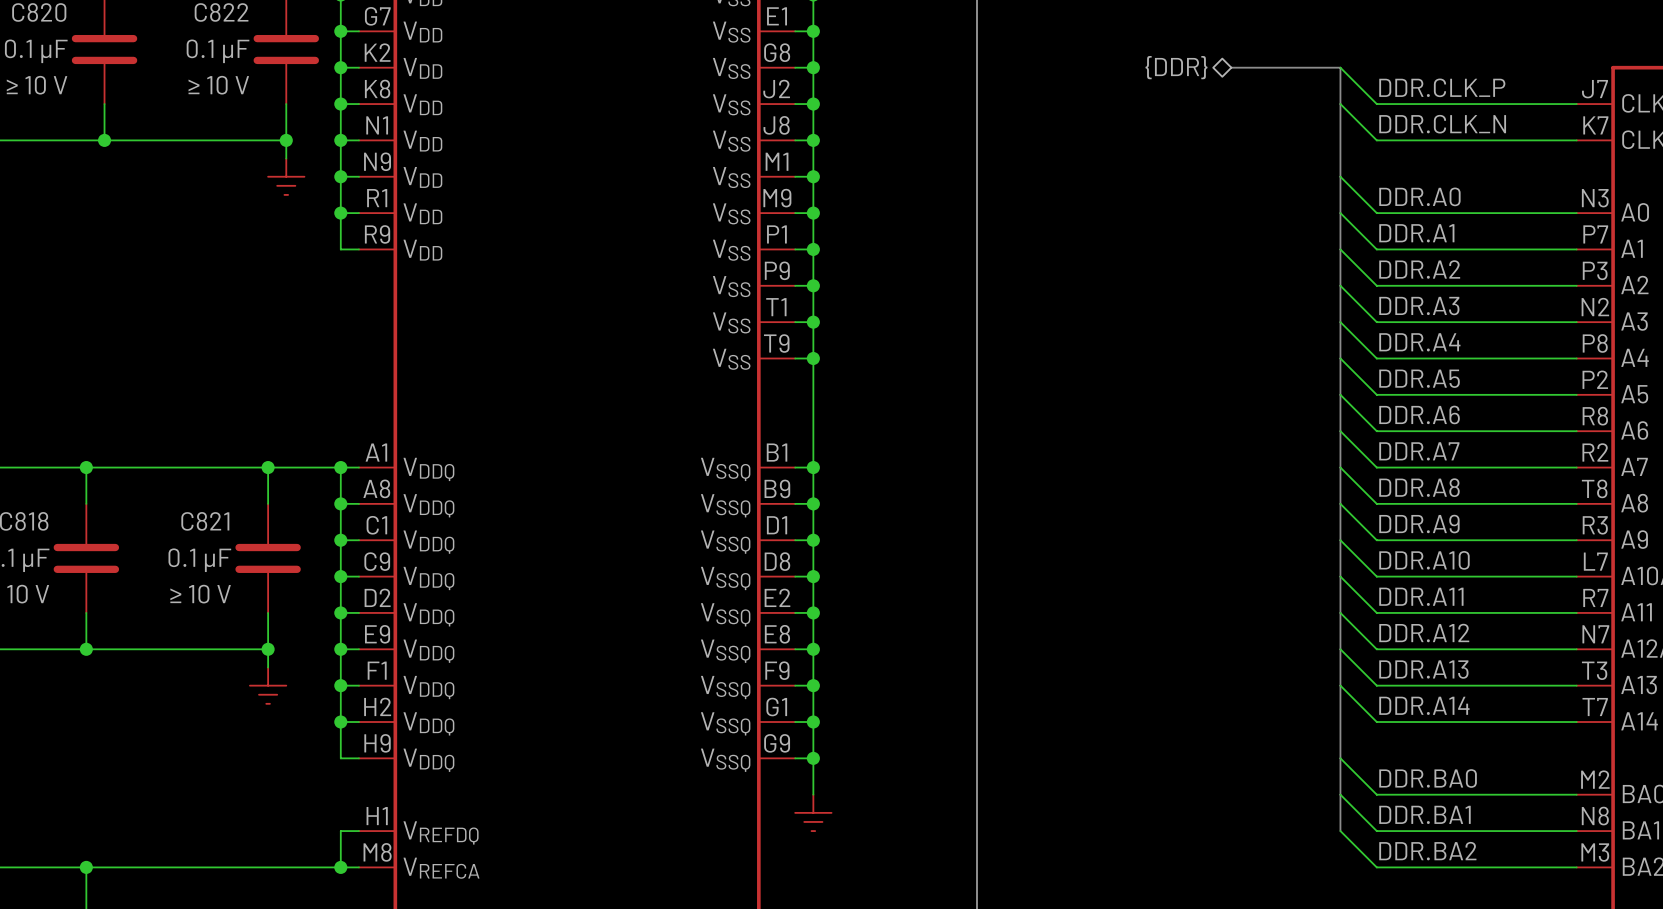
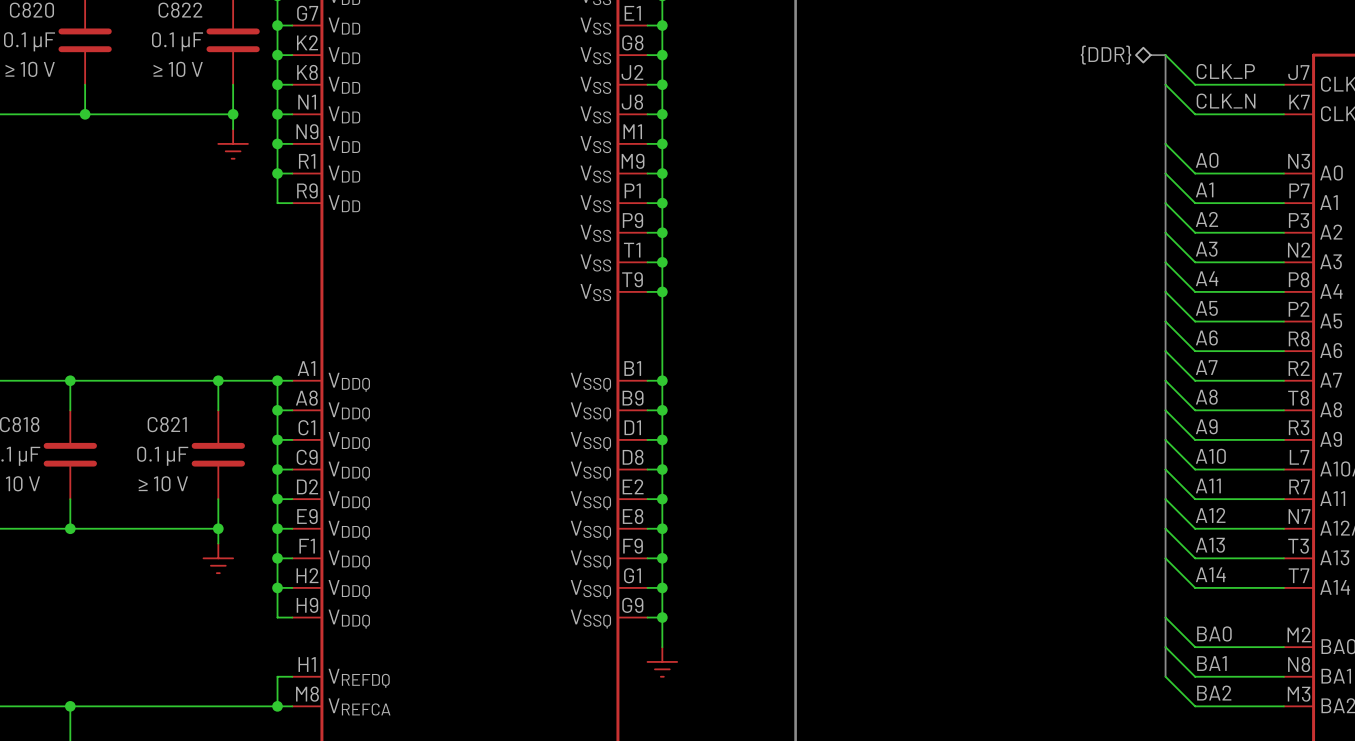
hierarchical label position: {DDR} (1176, 67) -> {DDR} (1106, 55)
bus: (1231, 67) (1340, 67) (1340, 831) -> none
wire: (1340, 67) (1376, 104) (1467, 104) -> (1165, 55) (1195, 84)
bus: none -> (1150, 55) (1165, 55) (1165, 676)
label: DDR.CLK_P (1442, 87) -> CLK_P (1225, 71)
wire: (1340, 104) (1376, 140) (1467, 140) -> (1165, 84) (1195, 114)
label: DDR.CLK_N (1442, 124) -> CLK_N (1226, 101)
wire: (1340, 176) (1376, 213) (1467, 213) -> (1165, 143) (1195, 173)
label: DDR.A0 (1419, 196) -> none
label: none -> A0 (1207, 160)
wire: (1340, 213) (1376, 249) (1467, 249) -> (1165, 173) (1195, 203)
label: DDR.A1 (1416, 233) -> none
label: none -> A1 (1204, 189)
wire: (1340, 249) (1376, 285) (1467, 285) -> (1165, 203) (1195, 232)
label: DDR.A2 (1419, 269) -> none
label: none -> A2 (1206, 219)
wire: (1340, 285) (1376, 322) (1467, 322) -> (1165, 232) (1195, 262)
label: DDR.A3 (1419, 306) -> none
label: none -> A3 (1206, 249)
wire: (1340, 322) (1376, 358) (1467, 358) -> (1165, 262) (1195, 291)
label: DDR.A4 (1419, 342) -> none
label: none -> A4 (1207, 278)
wire: (1340, 358) (1376, 394) (1467, 394) -> (1165, 291) (1195, 321)
label: DDR.A5 (1419, 378) -> none
label: none -> A5 (1206, 308)
wire: (1340, 394) (1376, 431) (1467, 431) -> (1165, 321) (1195, 351)
label: DDR.A6 (1419, 414) -> none
label: none -> A6 (1206, 337)
wire: (1340, 431) (1376, 467) (1467, 467) -> (1165, 351) (1195, 380)
label: DDR.A7 (1419, 451) -> none
label: none -> A7 (1206, 367)
wire: (1340, 467) (1376, 503) (1467, 503) -> (1165, 380) (1195, 410)
label: DDR.A8 (1419, 487) -> none
label: none -> A8 (1206, 397)
wire: (1340, 503) (1376, 540) (1467, 540) -> (1165, 410) (1195, 439)
label: DDR.A9 (1419, 524) -> none
label: none -> A9 (1206, 426)
wire: (1340, 540) (1376, 576) (1467, 576) -> (1165, 439) (1195, 469)
label: DDR.A10 (1424, 560) -> none
label: none -> A10 (1210, 456)
wire: (1340, 576) (1376, 612) (1467, 612) -> (1165, 469) (1195, 499)
label: DDR.A11 (1421, 596) -> none
label: none -> A11 (1208, 485)
wire: (1340, 612) (1376, 649) (1467, 649) -> (1165, 499) (1195, 528)
label: none -> A12 (1210, 515)
label: DDR.A12 (1424, 633) -> none
wire: (1340, 649) (1376, 685) (1467, 685) -> (1165, 528) (1195, 558)
label: DDR.A13 (1423, 669) -> none
label: none -> A13 (1210, 545)
wire: (1340, 685) (1376, 722) (1467, 722) -> (1165, 558) (1195, 587)
label: DDR.A14 (1424, 705) -> none
label: none -> A14 (1210, 574)
wire: (1340, 758) (1376, 794) (1467, 794) -> (1165, 617) (1195, 647)
label: DDR.BA0 (1428, 778) -> none
label: none -> BA0 (1214, 633)
wire: (1340, 794) (1376, 831) (1467, 831) -> (1165, 647) (1195, 676)
label: DDR.BA1 (1424, 814) -> none
label: none -> BA1 (1211, 663)
wire: (1340, 831) (1376, 867) (1467, 867) -> (1165, 676) (1195, 706)
label: DDR.BA2 (1427, 851) -> none
label: none -> BA2 (1214, 693)

